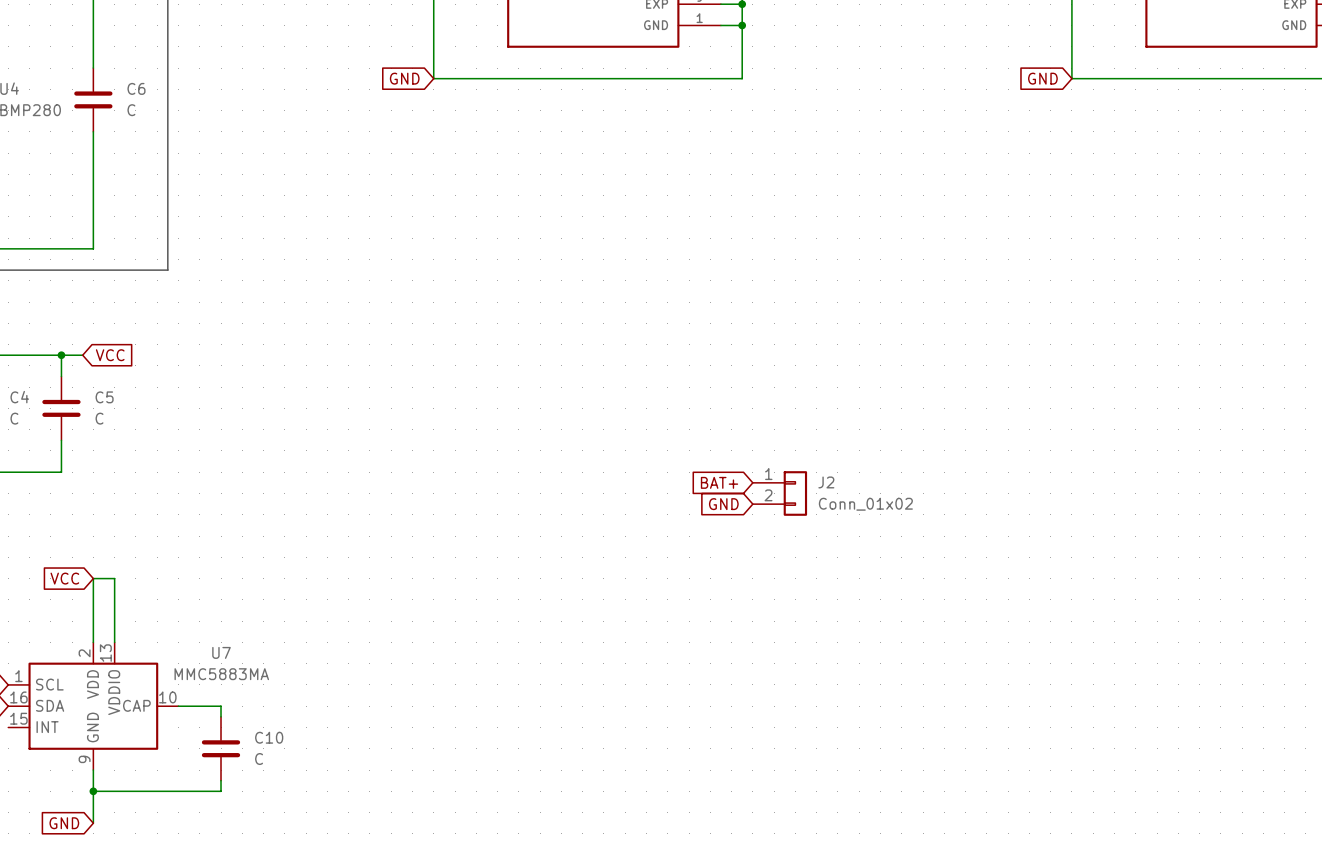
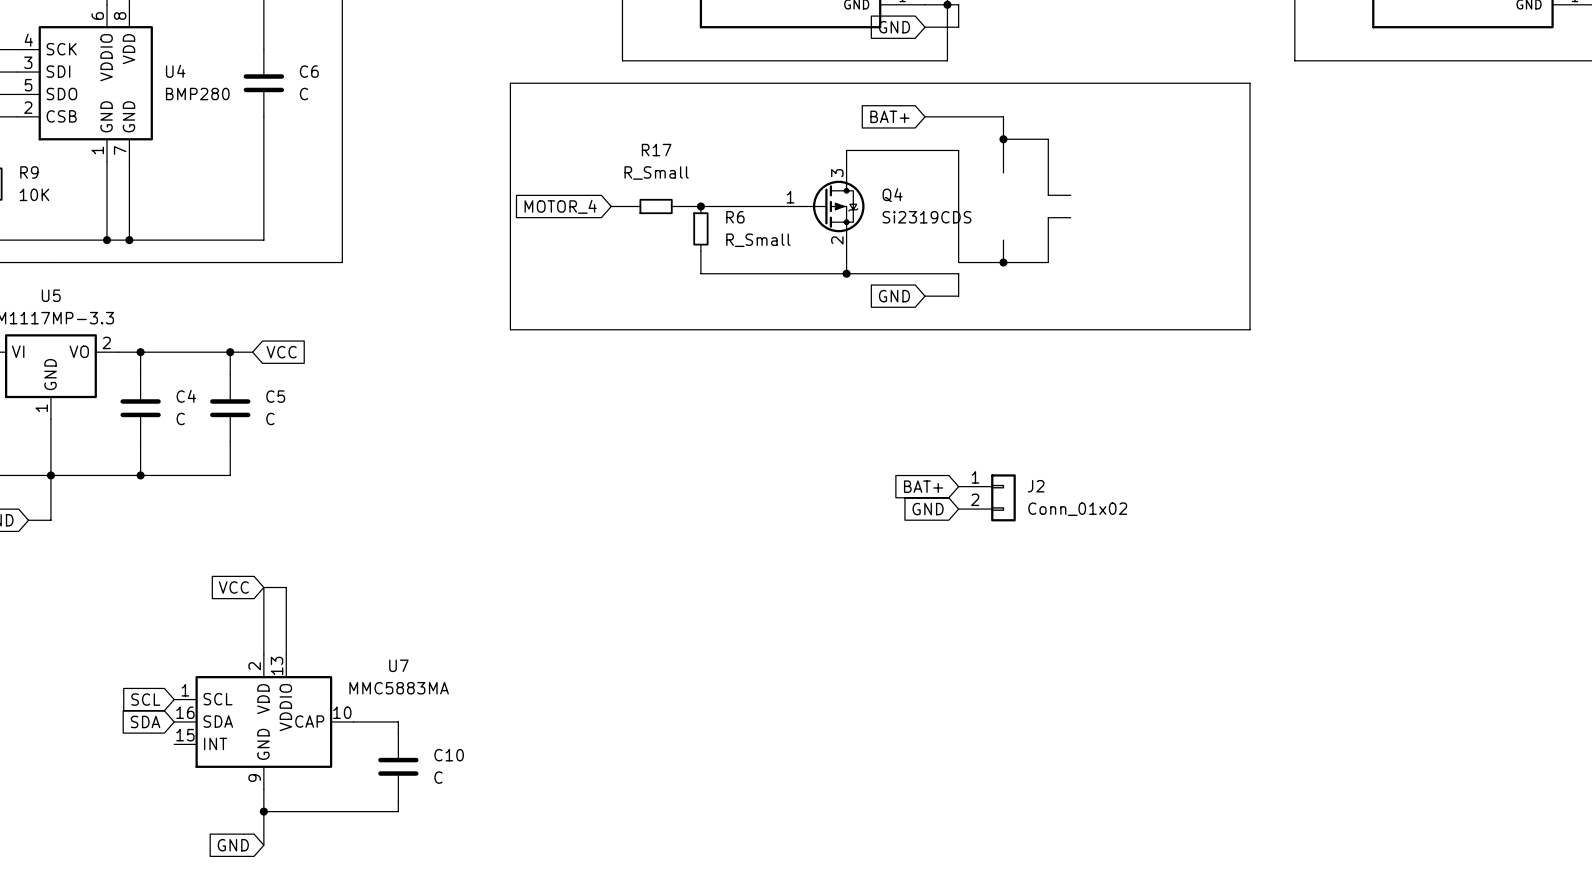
wire: none -> (947, 4) (958, 4) (958, 27) (925, 27)
global label: none -> GND (894, 27)
global label: GND (404, 78) -> none
global label: GND (1042, 78) -> none
line: none -> (510, 83) (510, 329) (1250, 329) (1250, 83) (510, 83)
global label: none -> BAT+ (889, 116)
wire: none -> (925, 116) (1003, 116) (1003, 172)
wire: none -> (1003, 139) (1048, 139) (1048, 195) (1070, 195)
junction: none -> (1003, 139)
wire: none -> (846, 161) (846, 150) (958, 150) (958, 262) (1048, 262) (1048, 217) (1070, 217)
wire: none -> (611, 206) (633, 206)
R17: none -> R_Small (656, 206)
wire: none -> (678, 206) (779, 206)
junction: none -> (700, 206)
Q4: none -> Si2319CDS (821, 206)
global label: none -> MOTOR_4 (560, 206)
R6: none -> R_Small (700, 228)
wire: none -> (1003, 240) (1003, 262)
wire: none -> (700, 251) (700, 273) (958, 273) (958, 296) (925, 296)
wire: none -> (846, 251) (846, 273)
junction: none -> (1003, 262)
junction: none -> (846, 273)
global label: none -> GND (894, 296)

